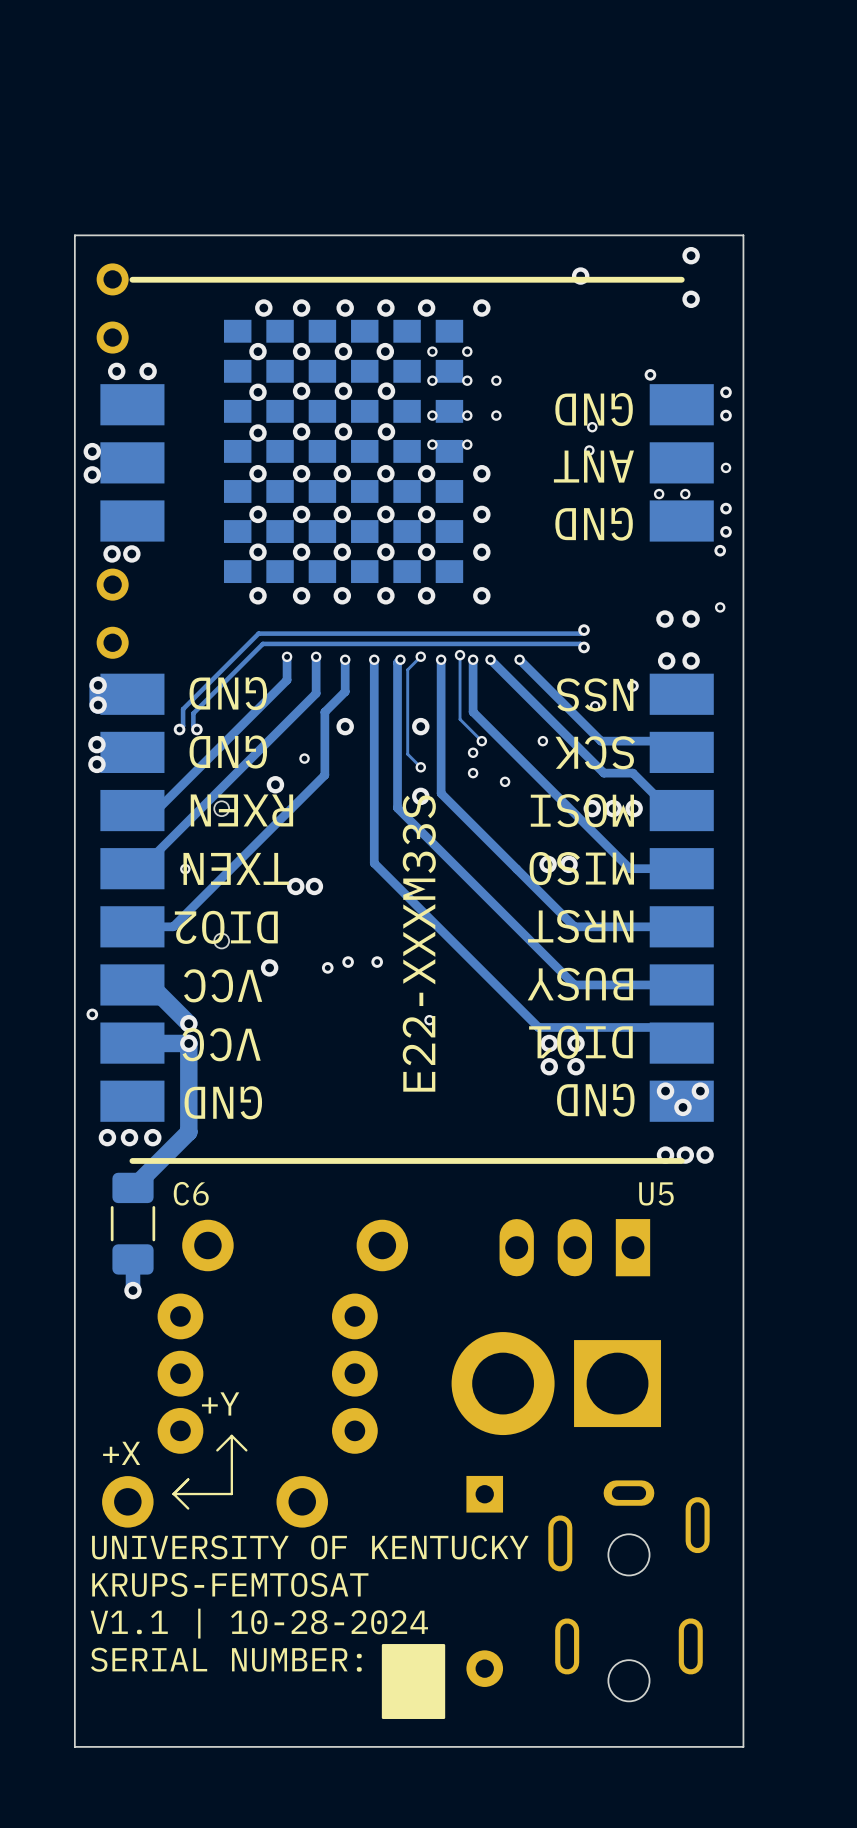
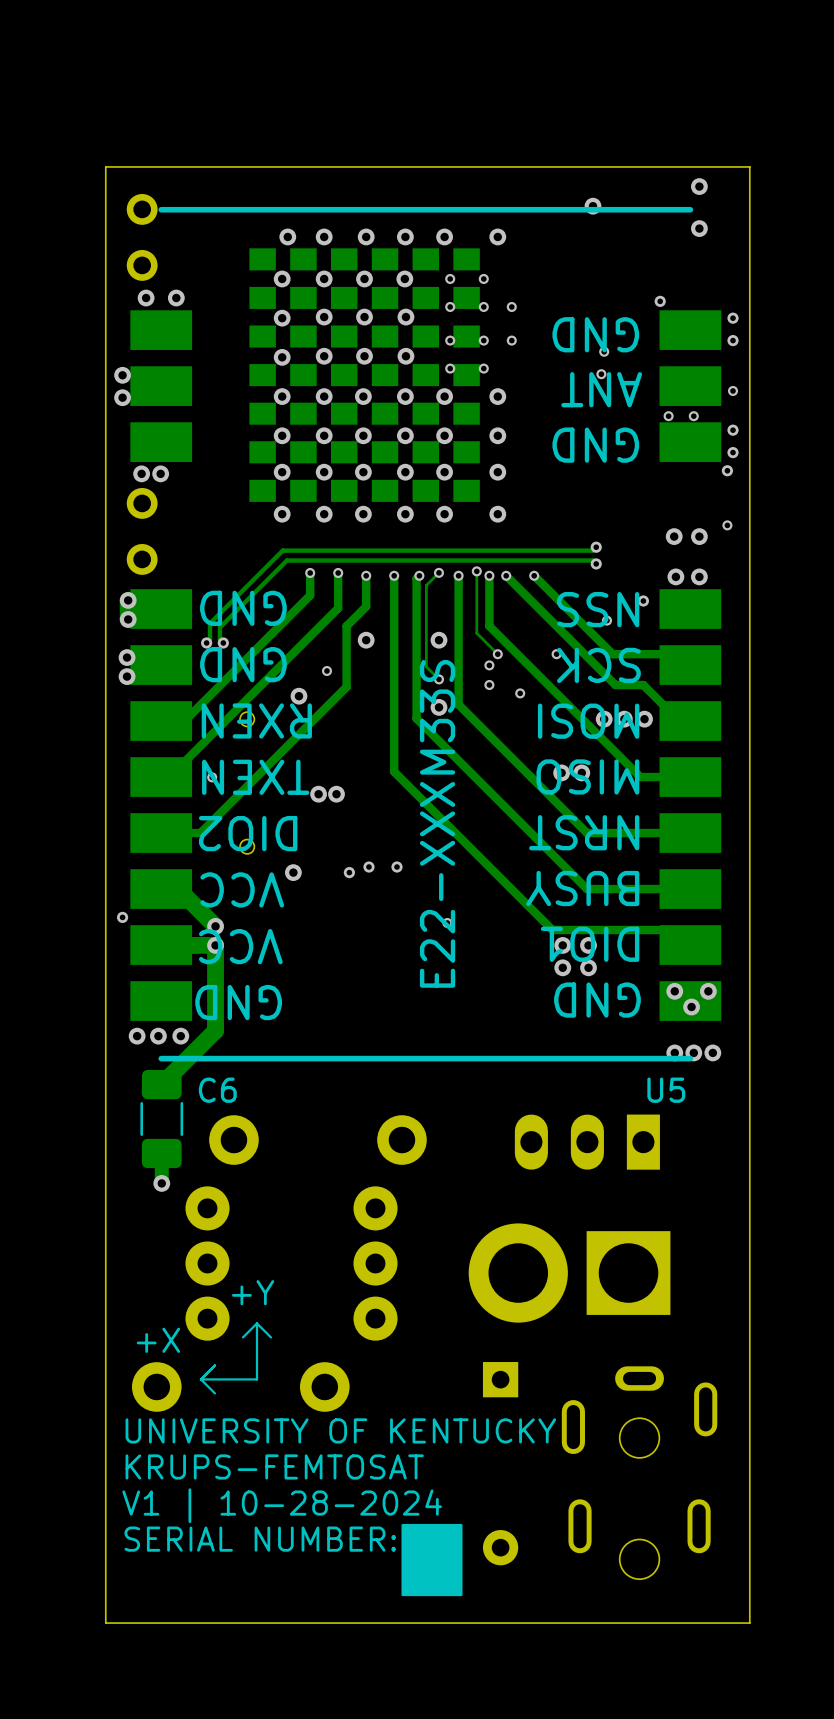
text: V1.1 | 10-28-2024 (259, 1623) -> V1 | 10-28-2024 (282, 1505)

